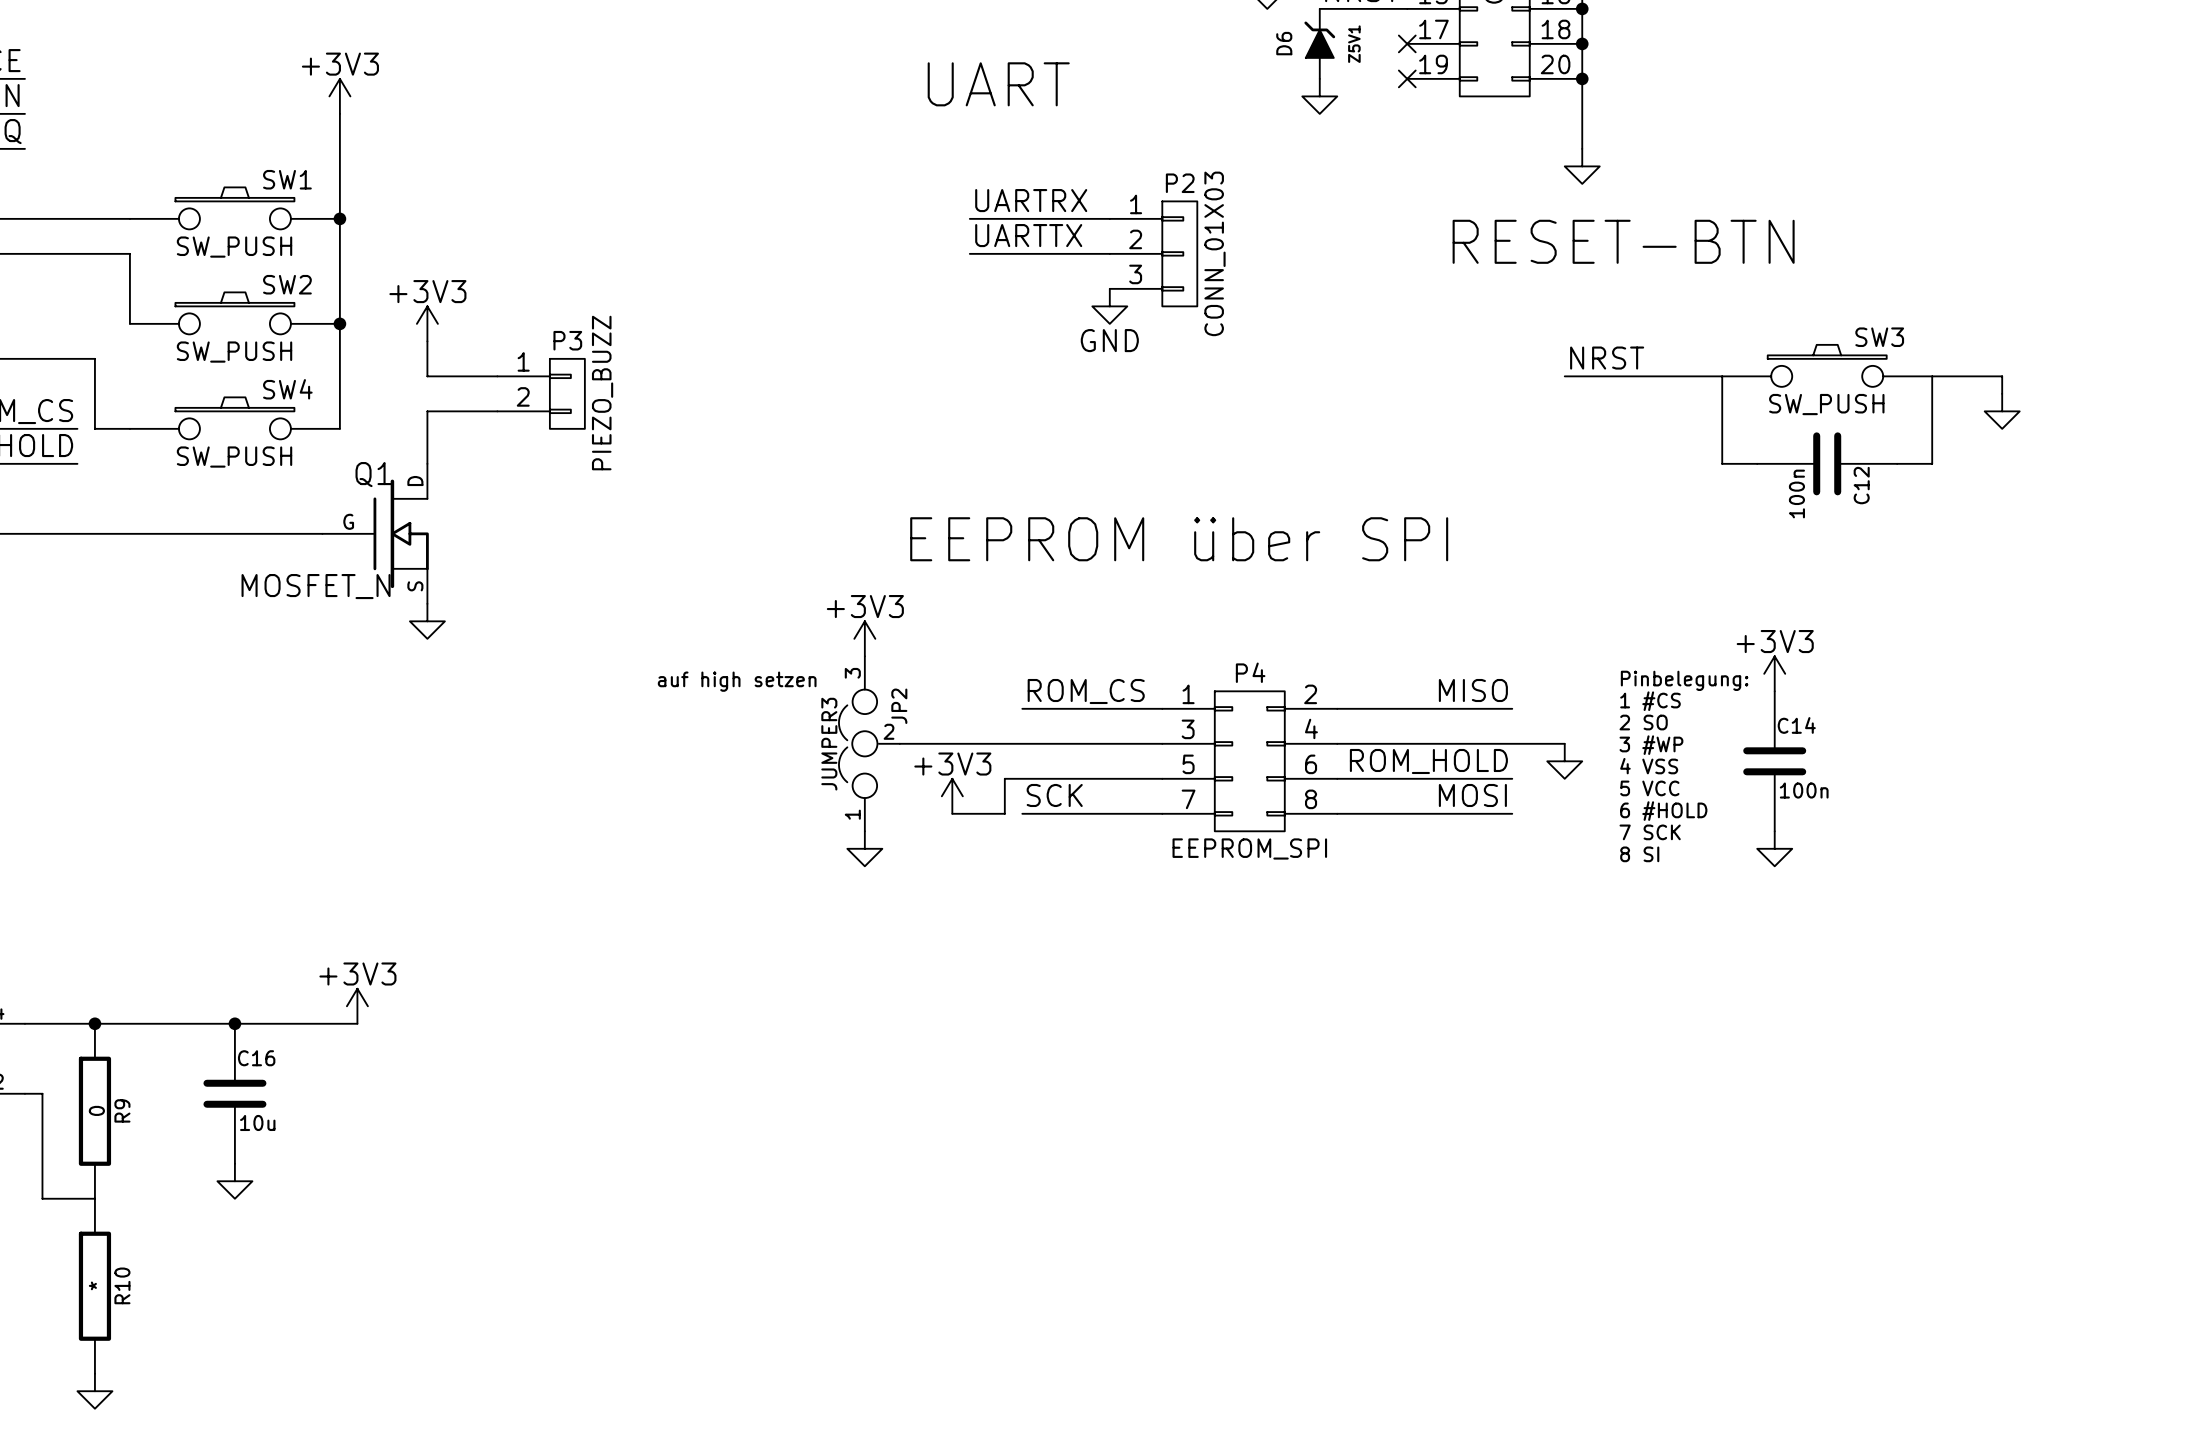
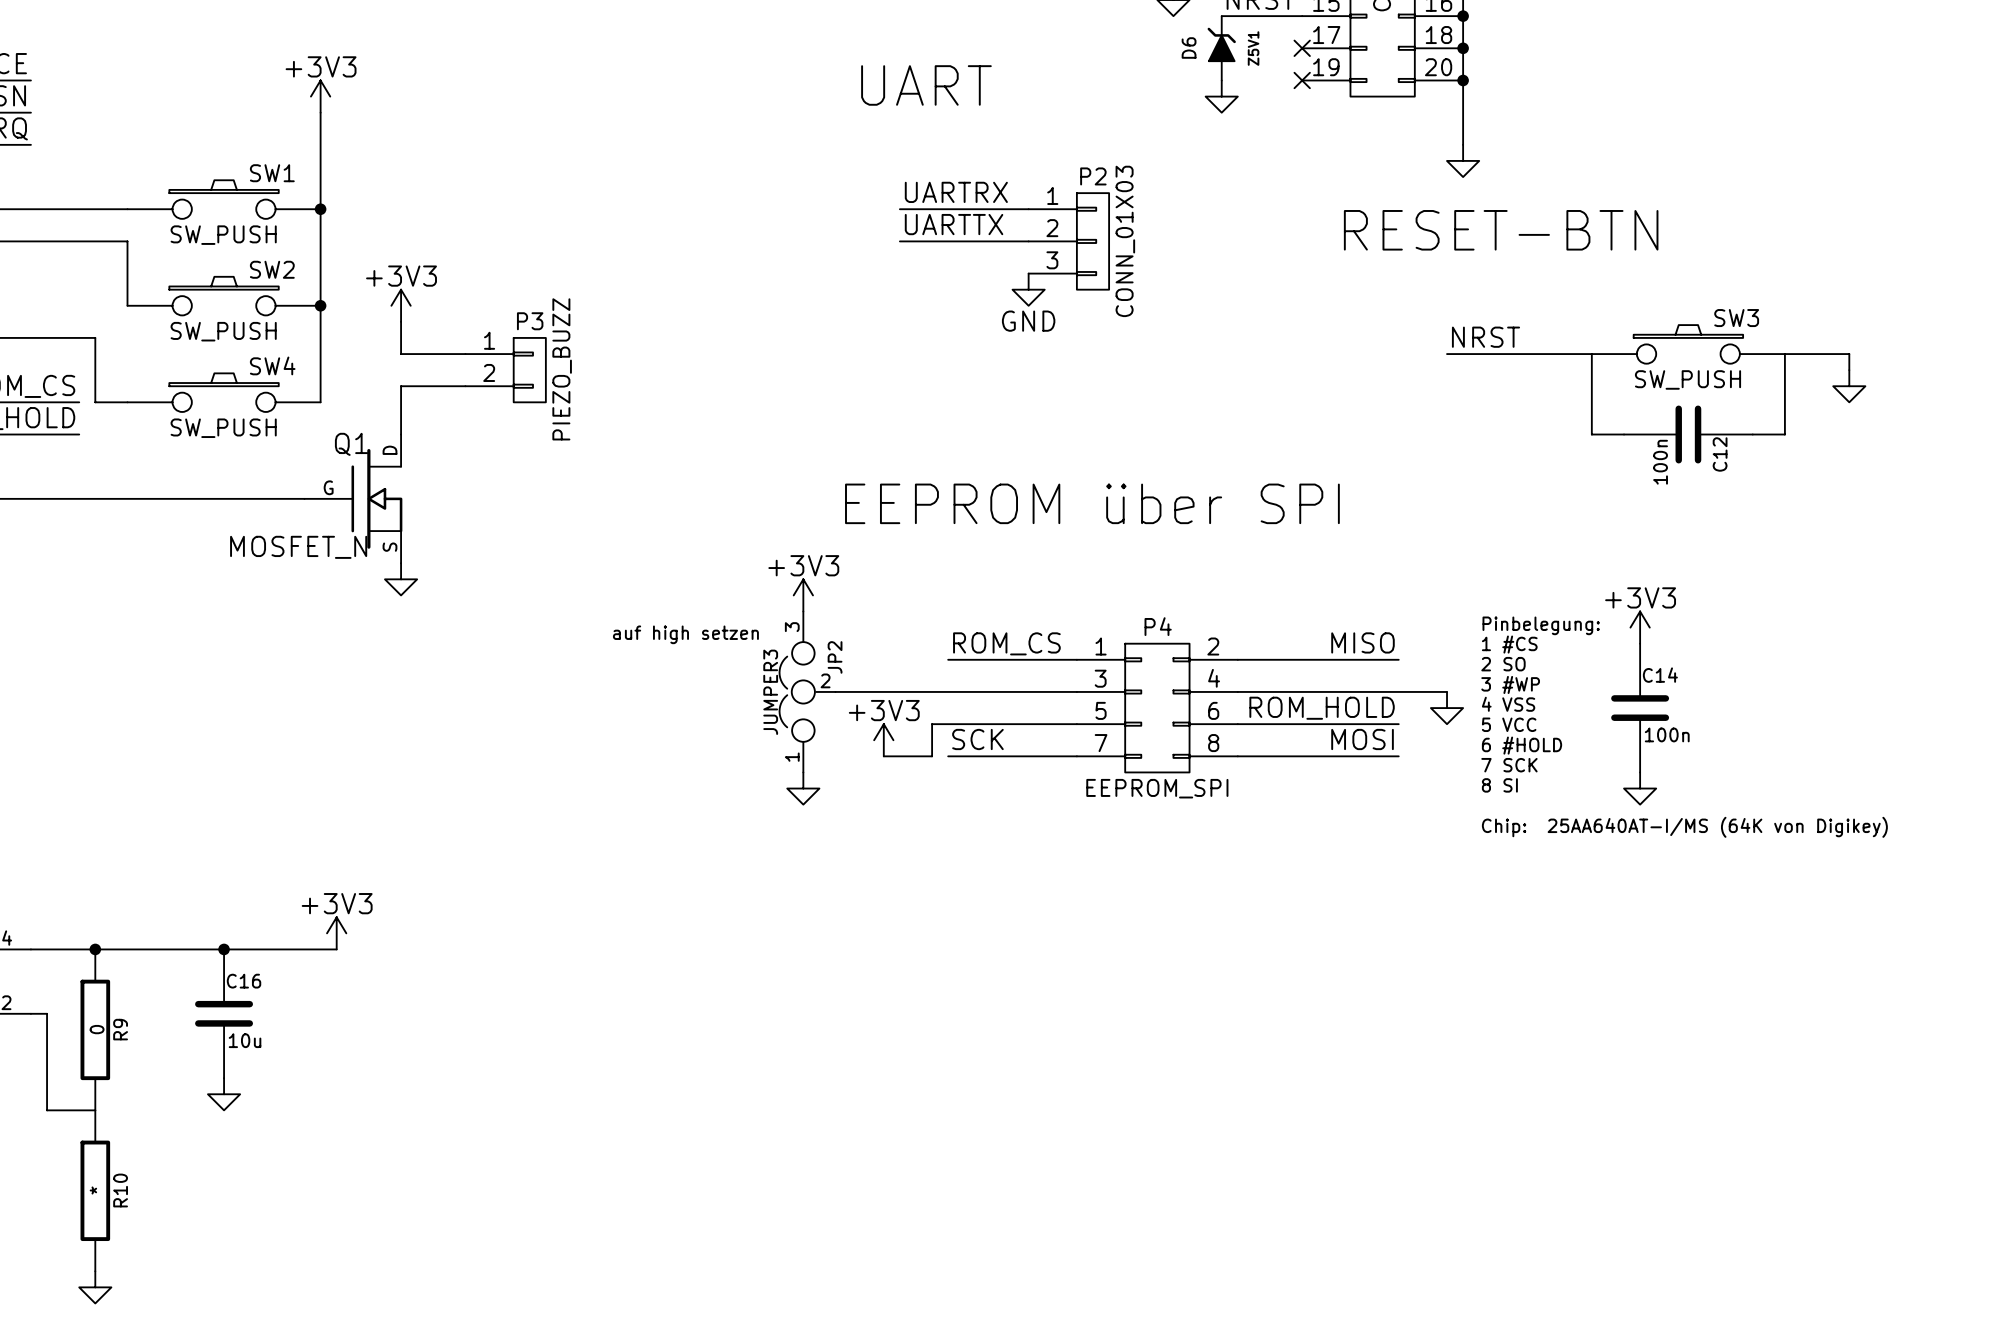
text position: Pinbelegung: (1684, 680) -> Pinbelegung: (1541, 625)
text position: 1 #CS (1650, 701) -> 1 #CS (1509, 644)
text position: 2 SO (1643, 722) -> 2 SO (1503, 664)
text position: 3 #WP (1651, 745) -> 3 #WP (1510, 684)
text position: 4 VSS (1649, 766) -> 4 VSS (1508, 704)
text position: 5 VCC (1649, 788) -> 5 VCC (1509, 724)
text position: 6 #HOLD (1663, 811) -> 6 #HOLD (1522, 745)
text position: 7 SCK (1650, 832) -> 7 SCK (1509, 765)
text position: 8 SI (1639, 854) -> 8 SI (1499, 785)
text: none -> Chip: 25AA640AT-I/MS (64K von Digikey) (1684, 827)

